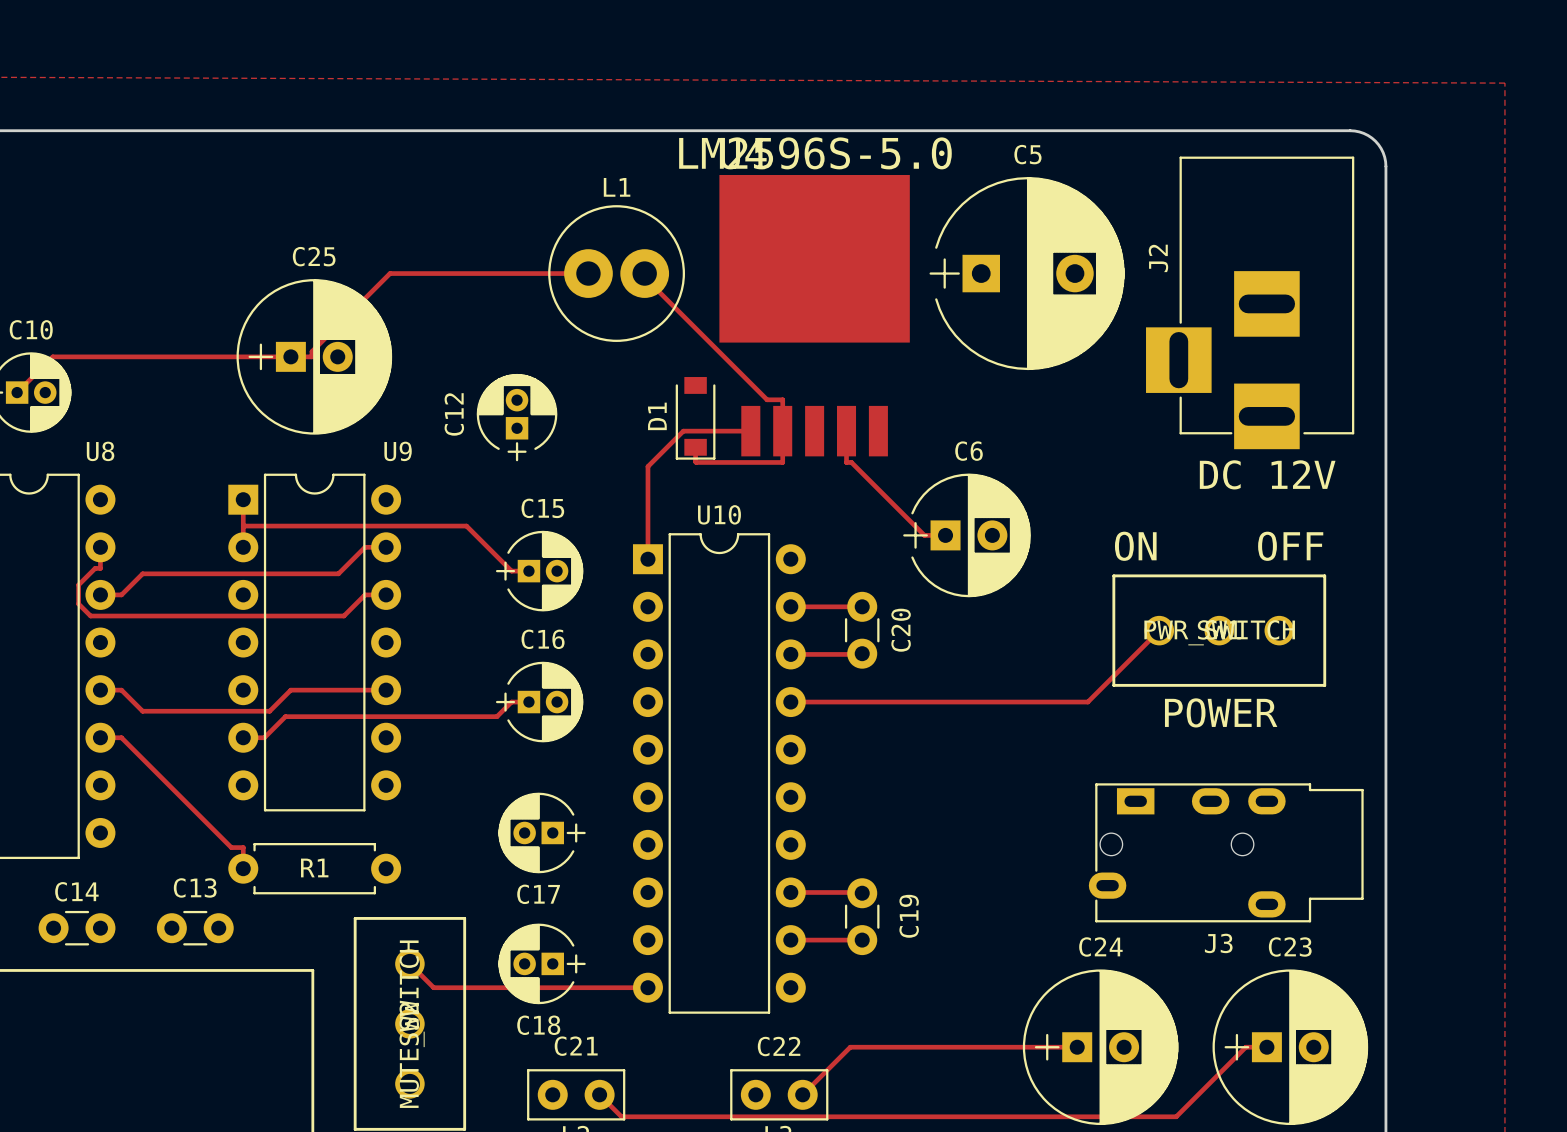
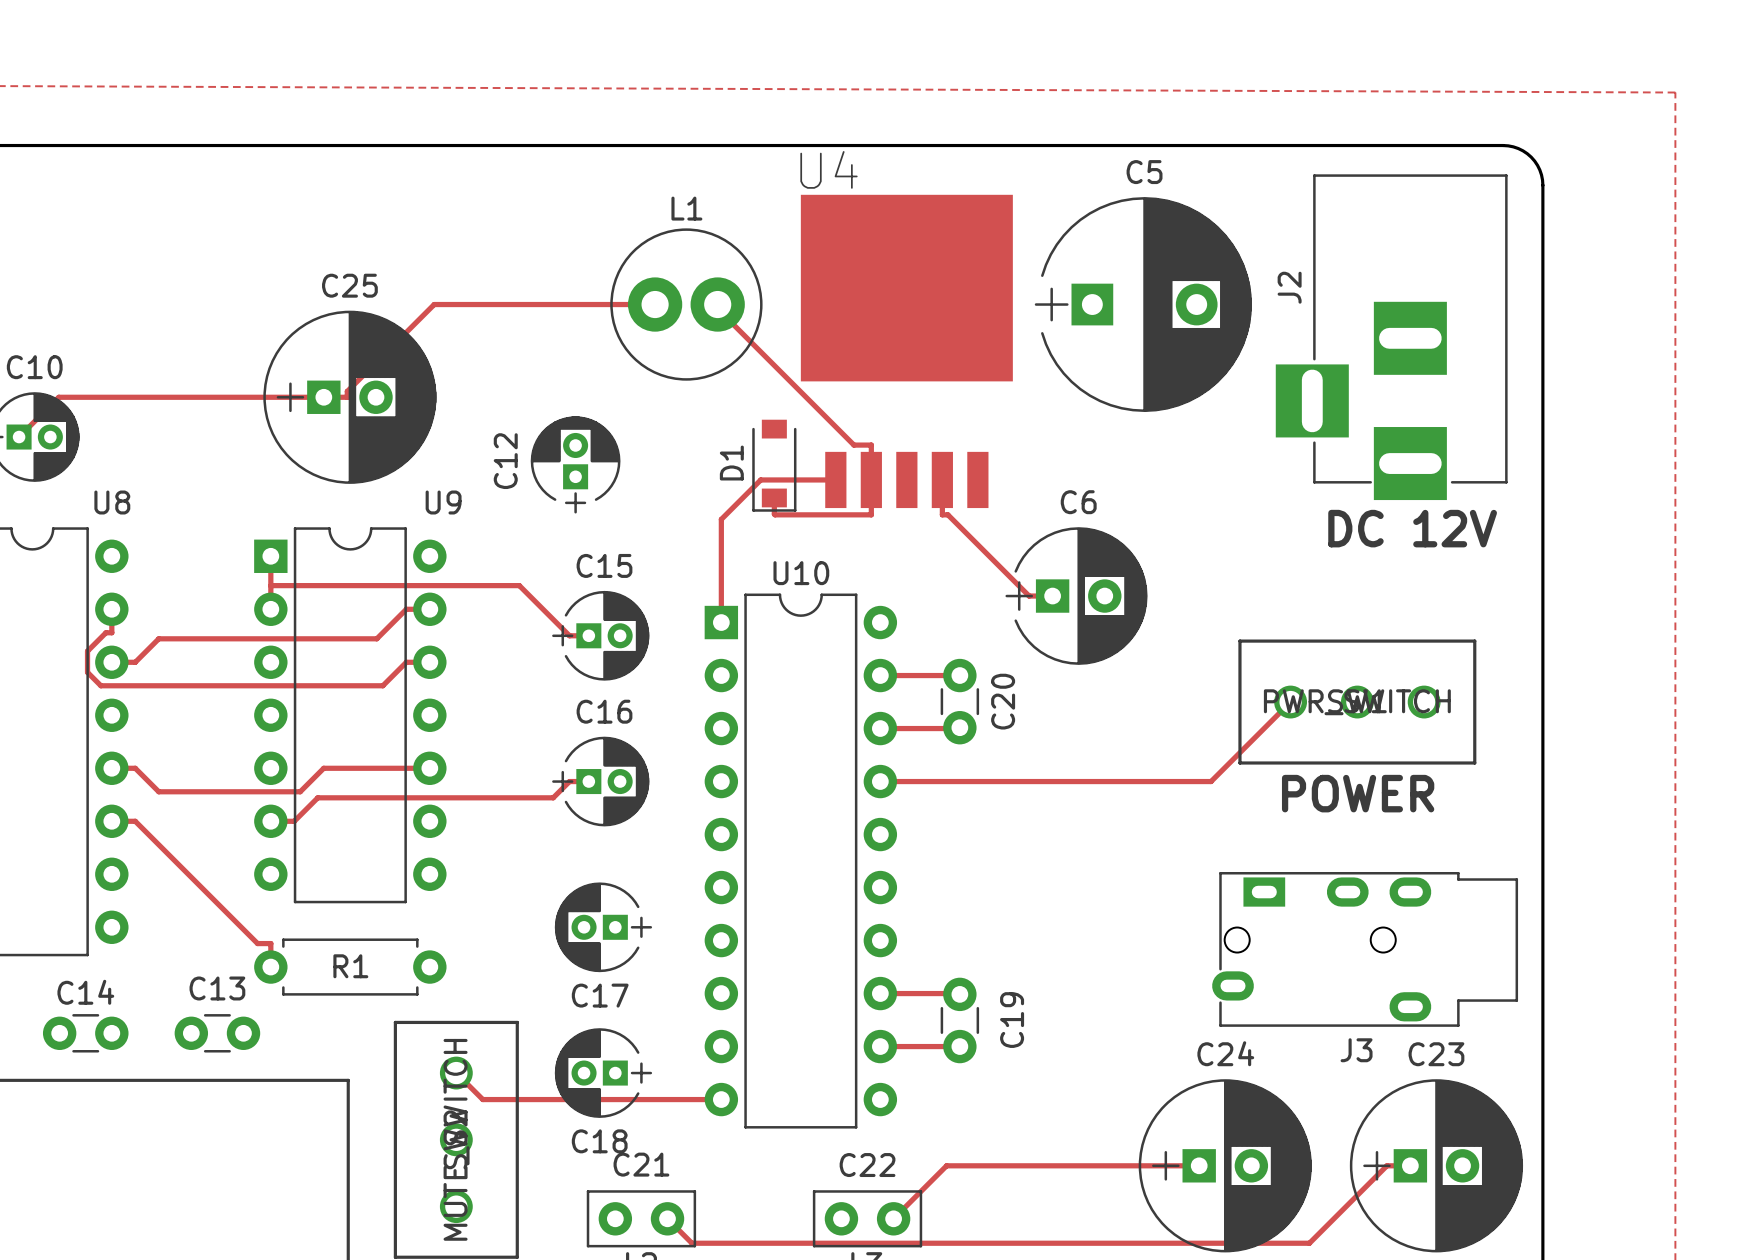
U4 value: LM2596S-5.0 (815, 153) -> none
text: ON (1135, 546) -> none
text: OFF (1290, 546) -> none

